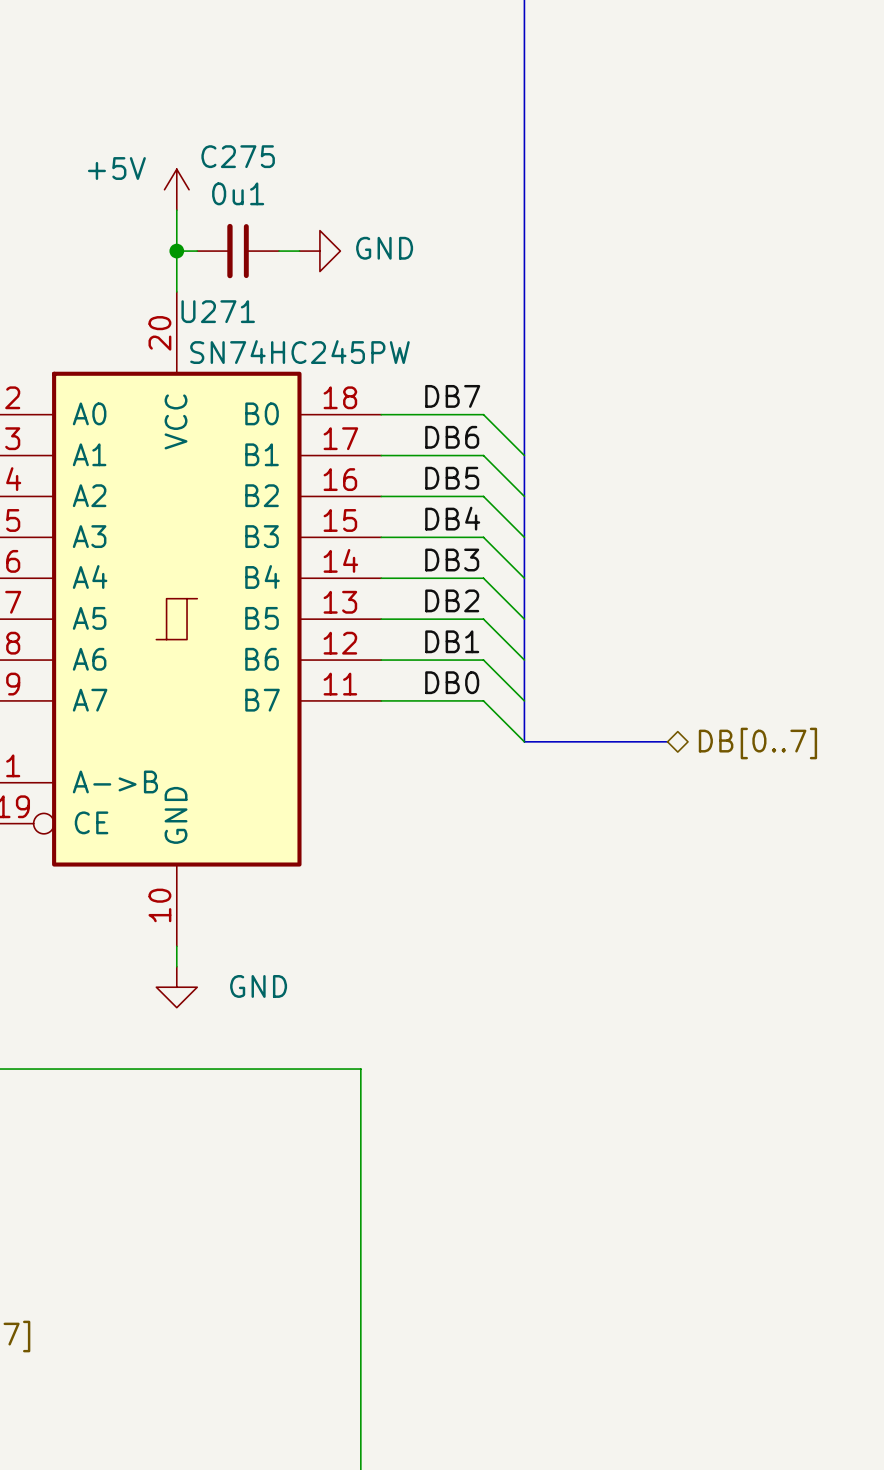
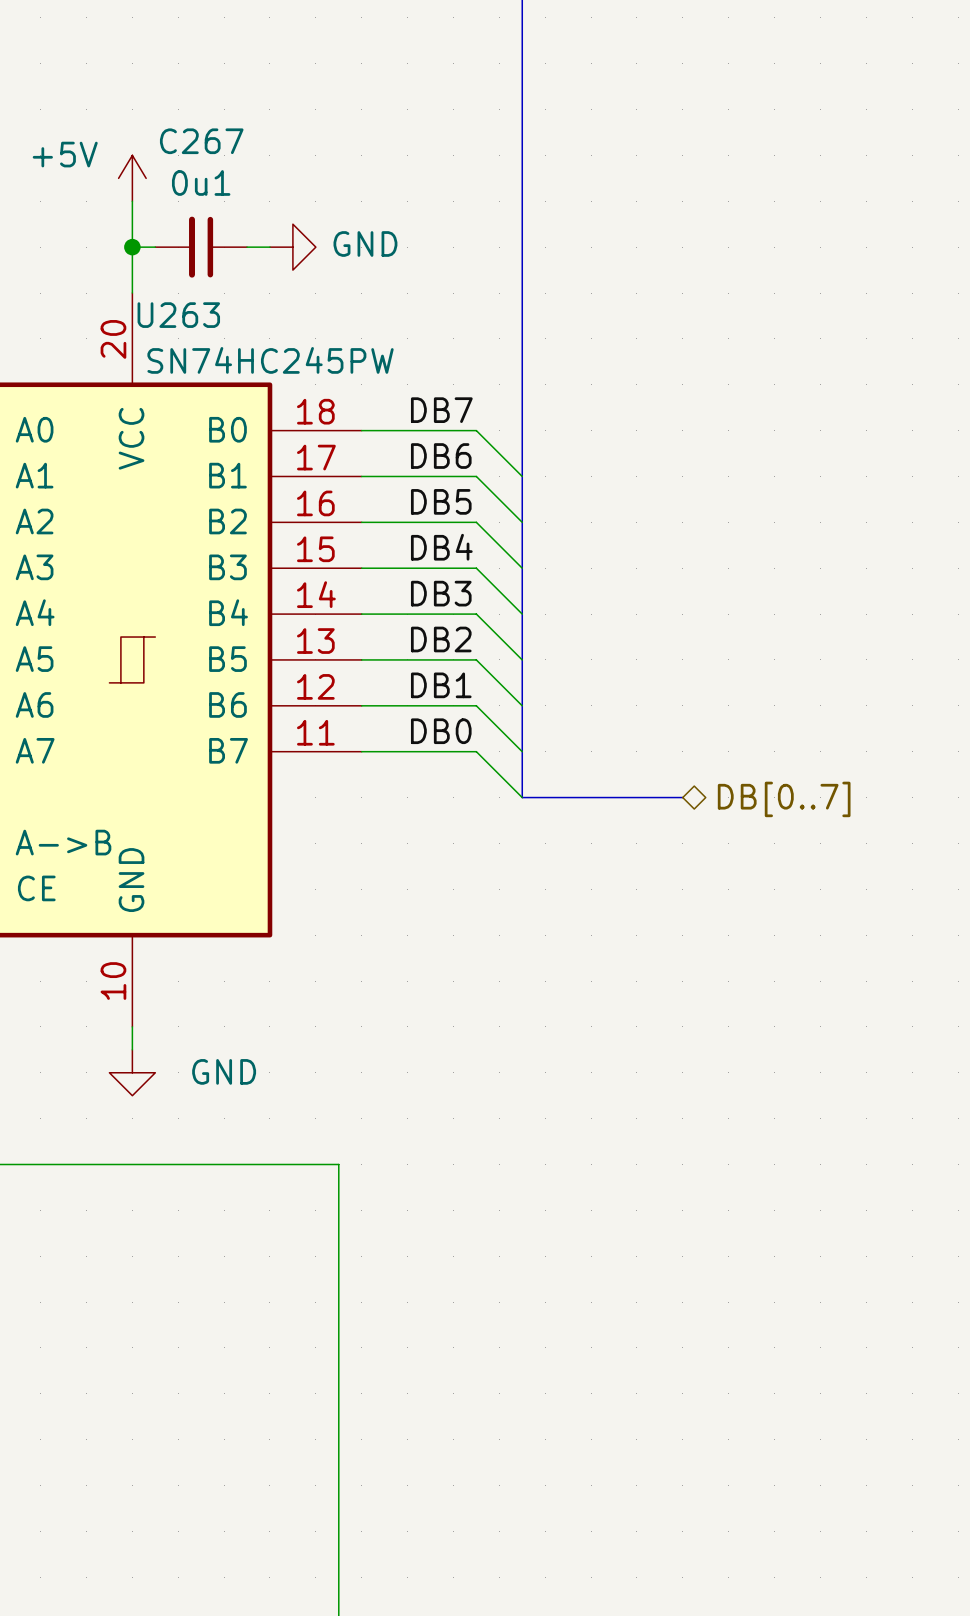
C275 name: C275 (238, 156) -> C267 (201, 141)
U271 name: U271 (218, 311) -> U263 (178, 315)

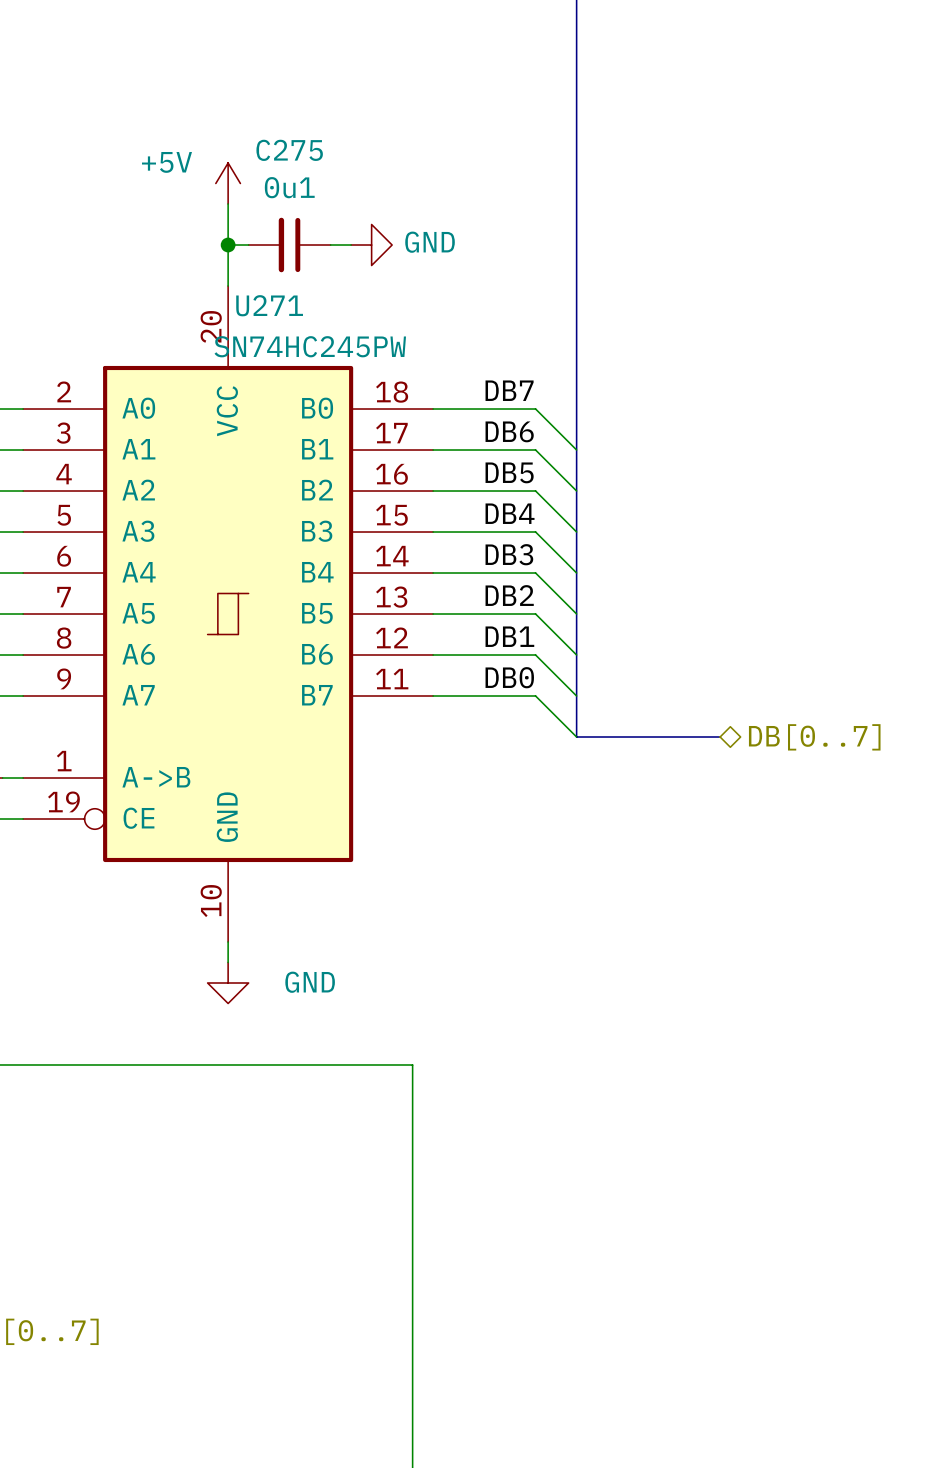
C267 name: C267 (201, 141) -> C275 (289, 150)
U263 name: U263 (178, 315) -> U271 (269, 305)
U263 value position: SN74HC245PW (270, 360) -> SN74HC245PW (310, 346)

